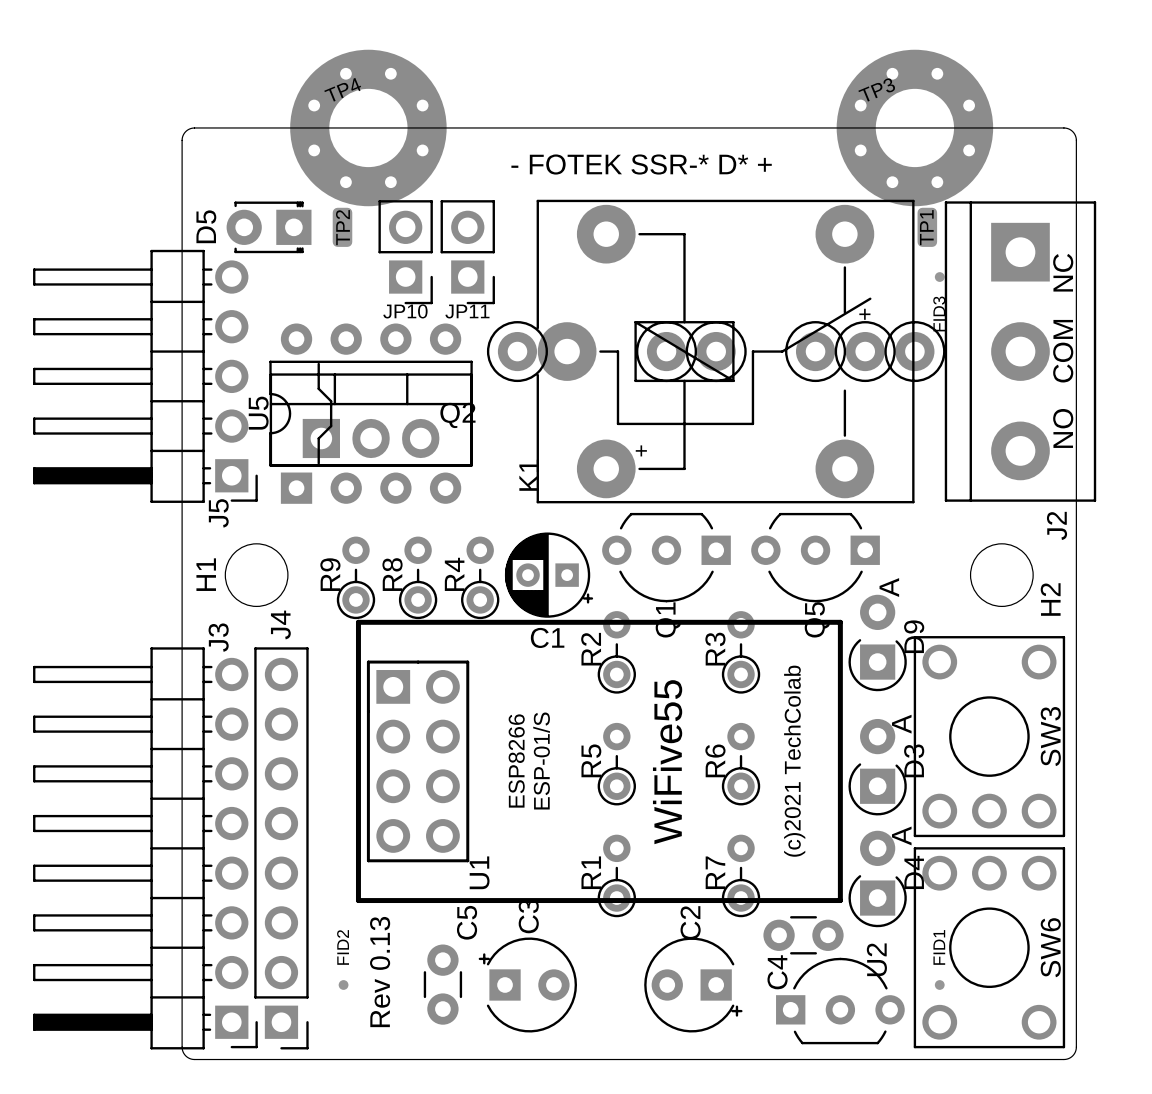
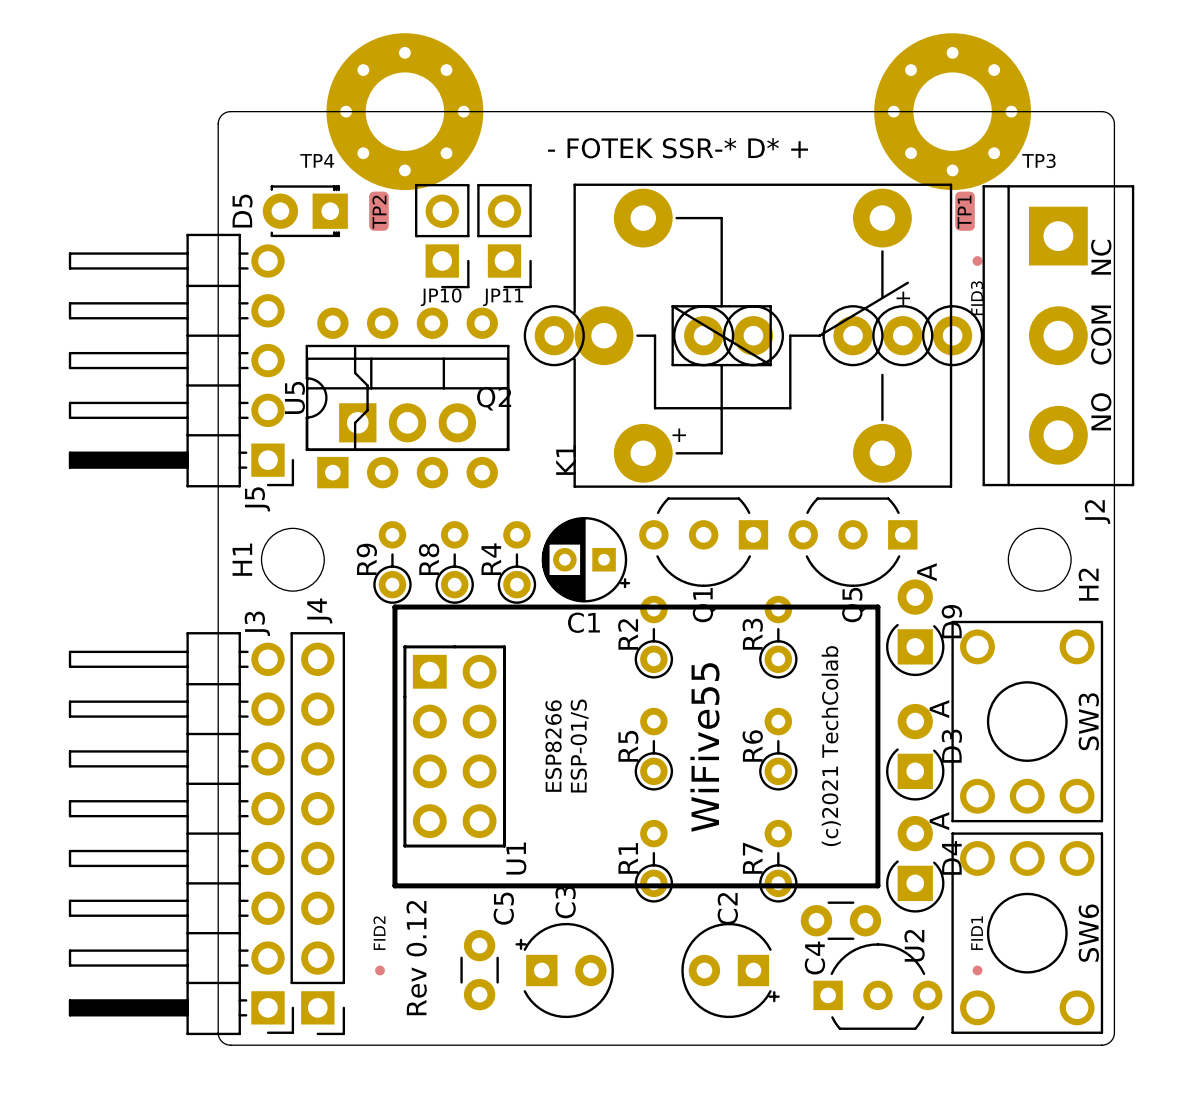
TP4 name position: TP4 (342, 89) -> TP4 (317, 160)
TP3 name position: TP3 (876, 89) -> TP3 (1038, 160)
TP4 rotation: 0° (368, 127) -> 22.5° clockwise (404, 111)
TP3 rotation: 0° (914, 127) -> 22.5° clockwise (952, 111)
text: Rev 0.13 (380, 972) -> Rev 0.12 (416, 958)

